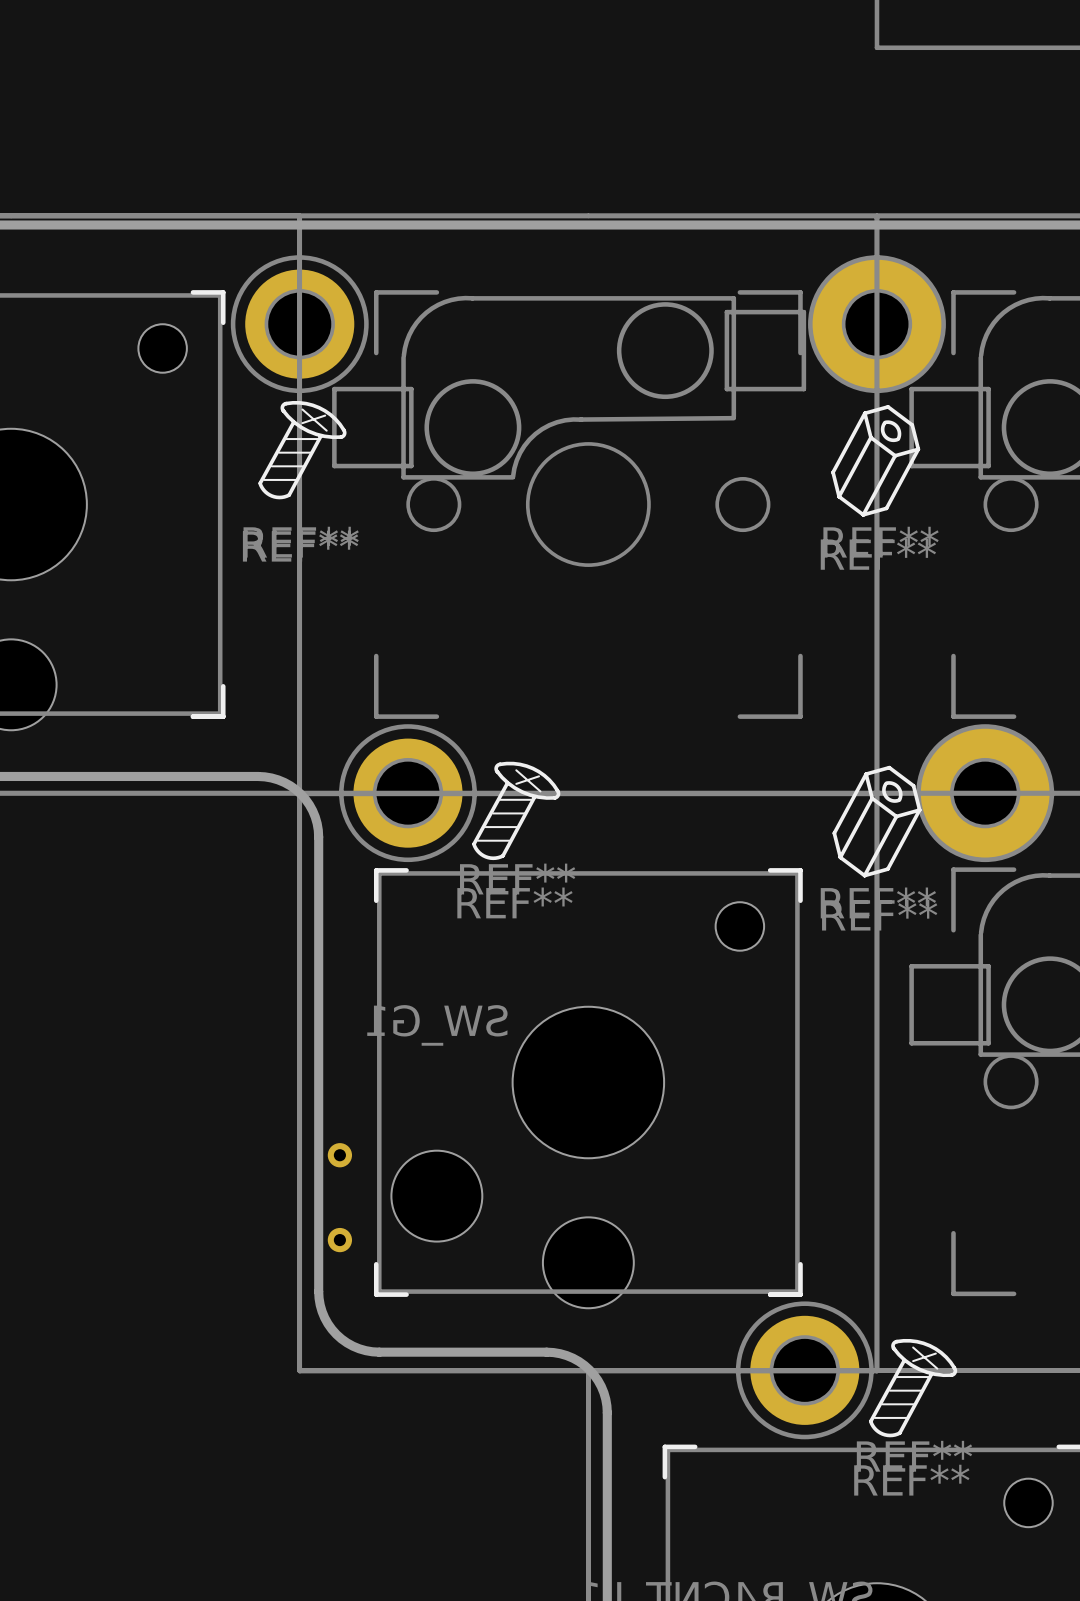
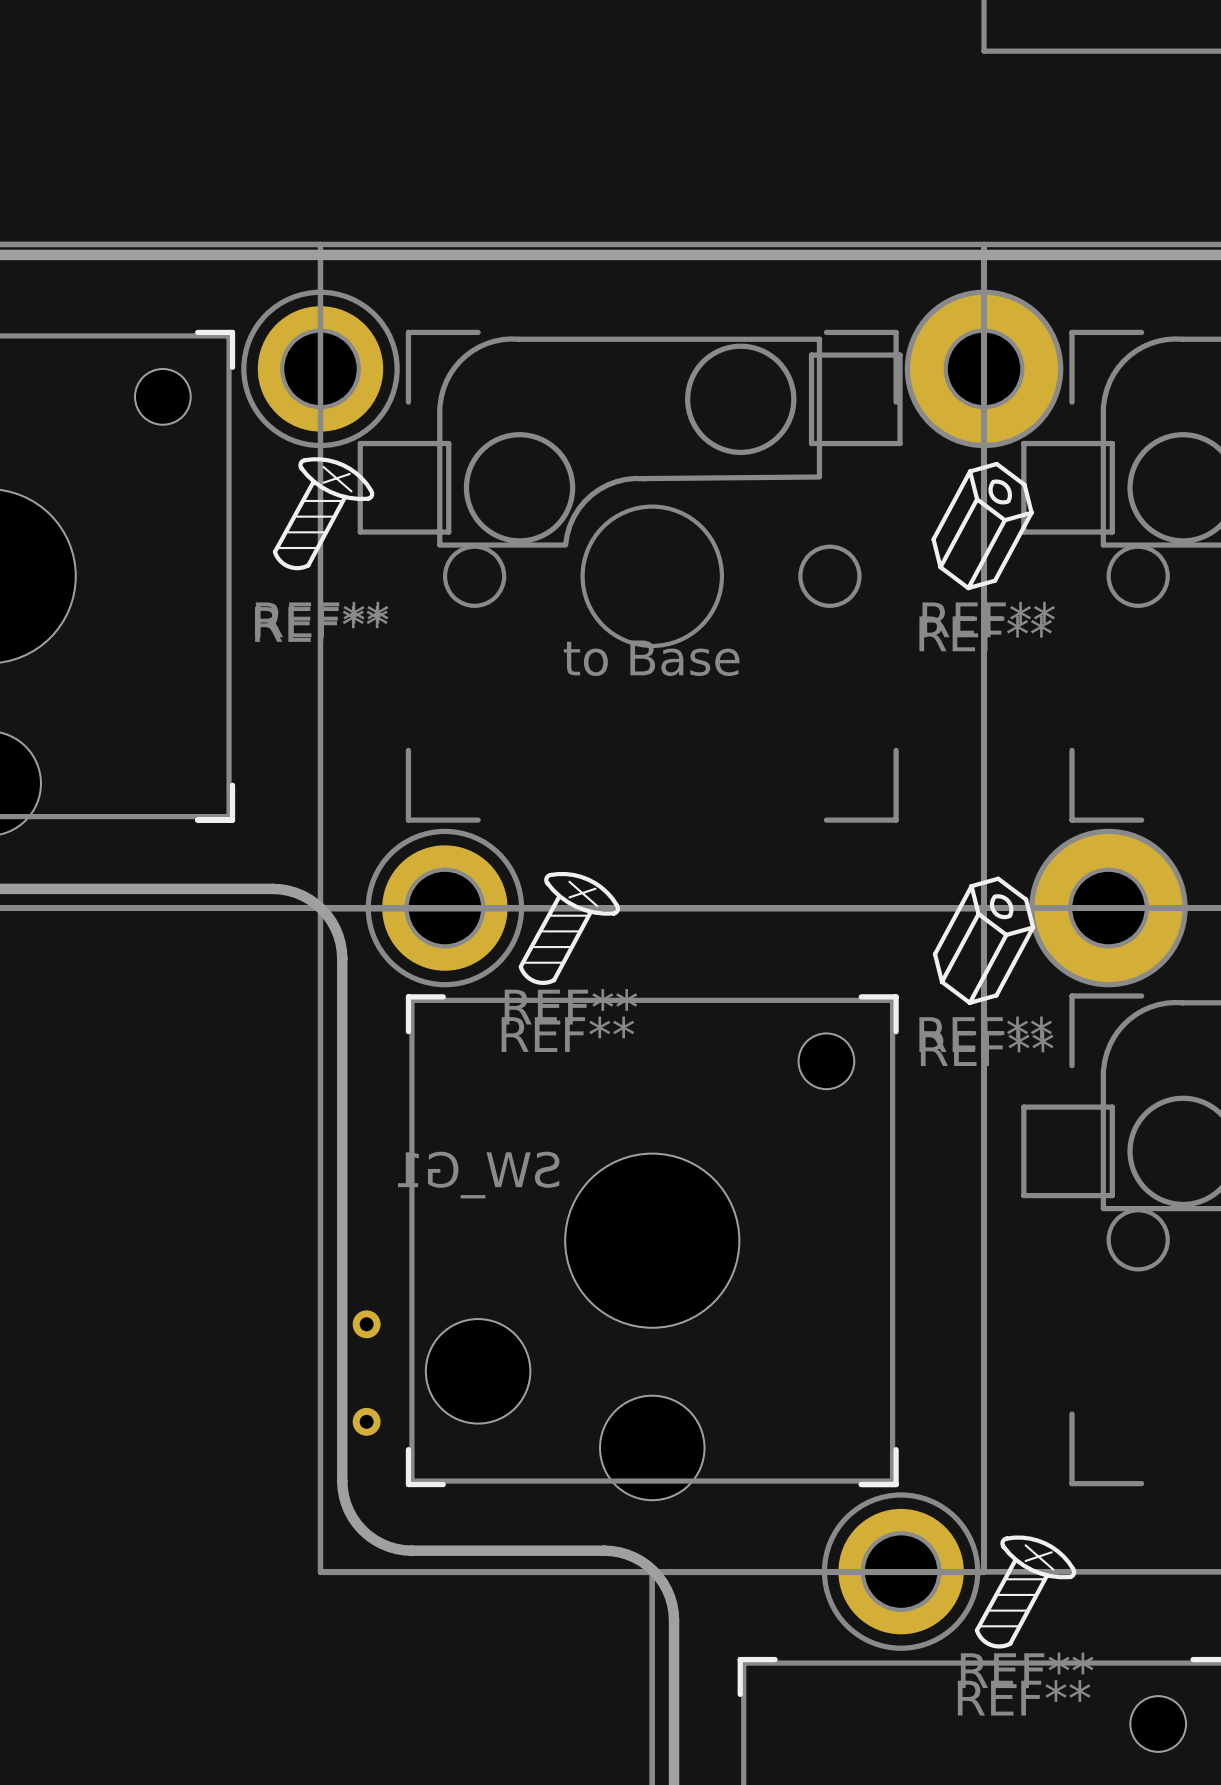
text: none -> to Base (651, 658)

